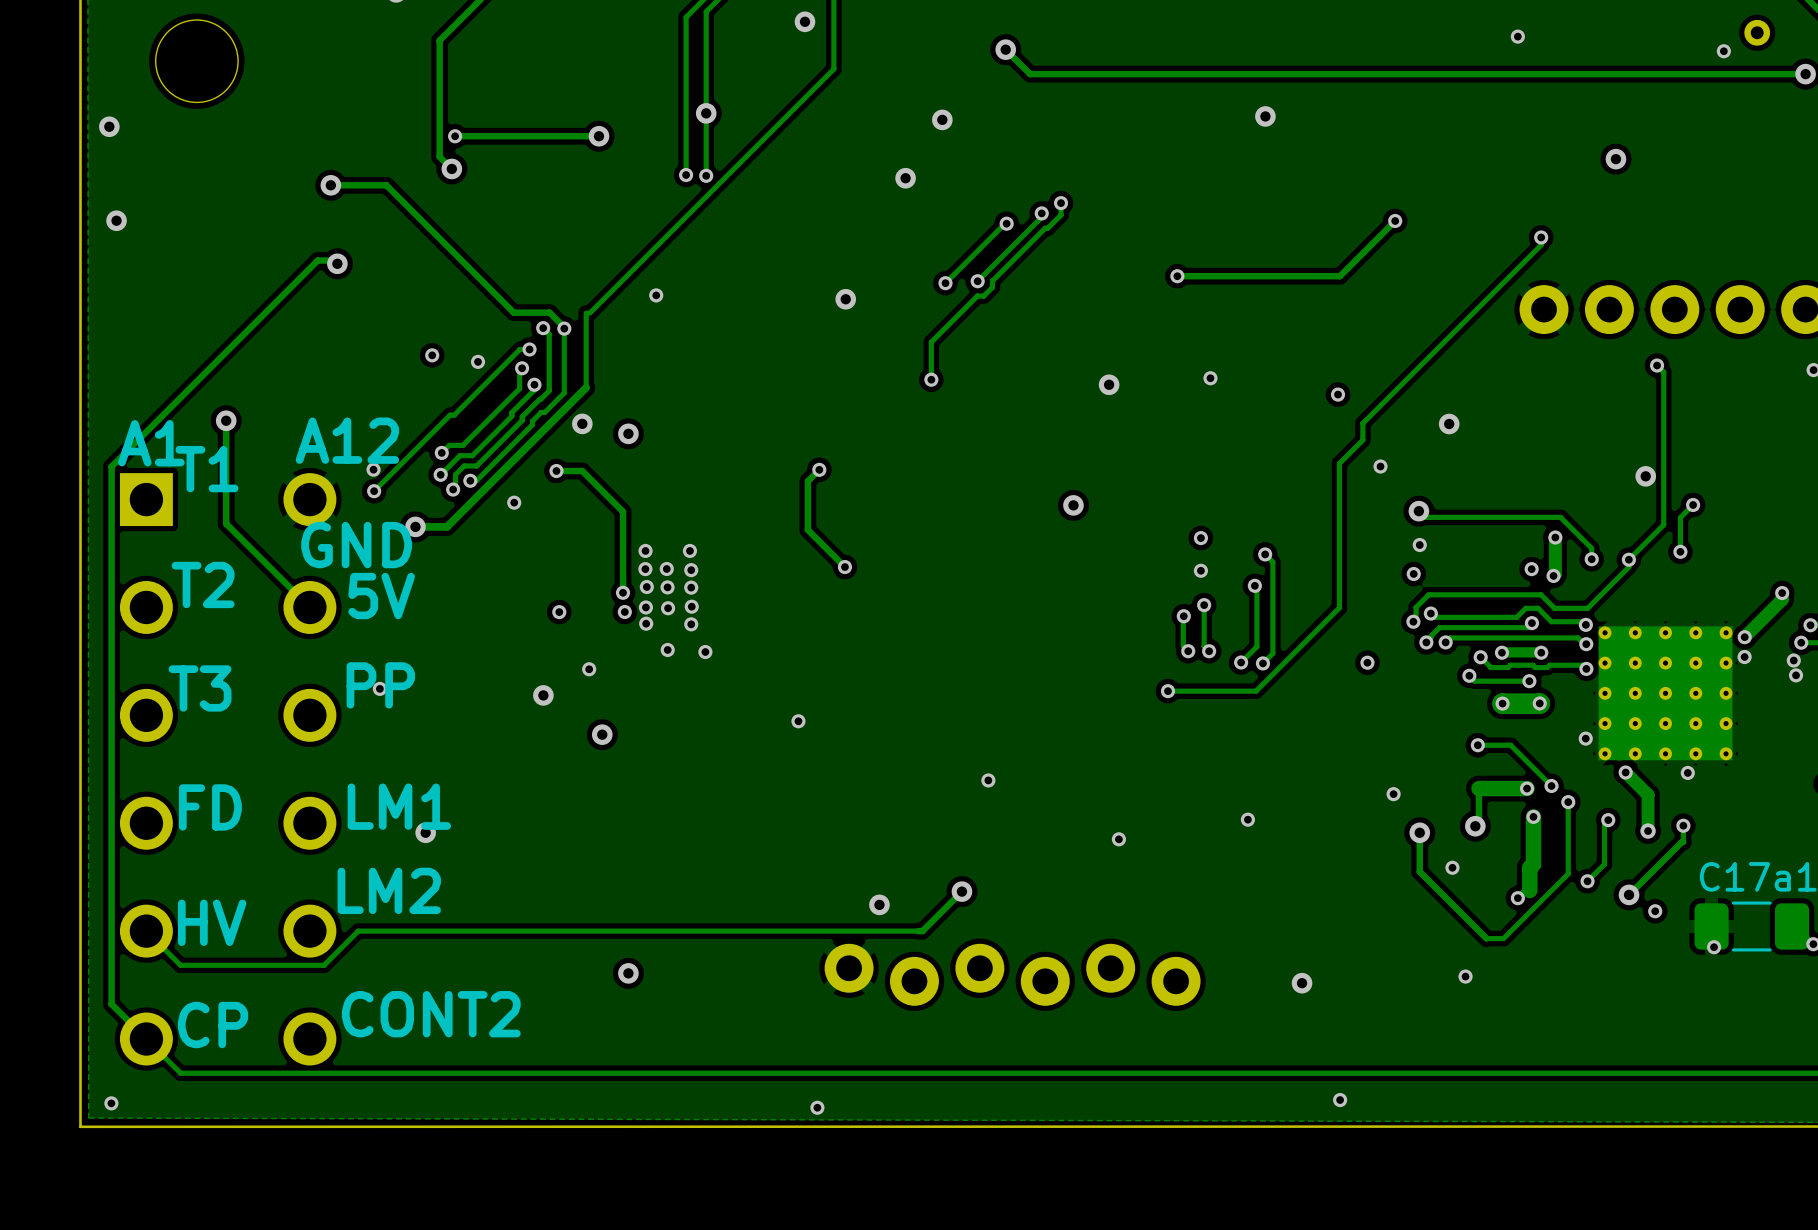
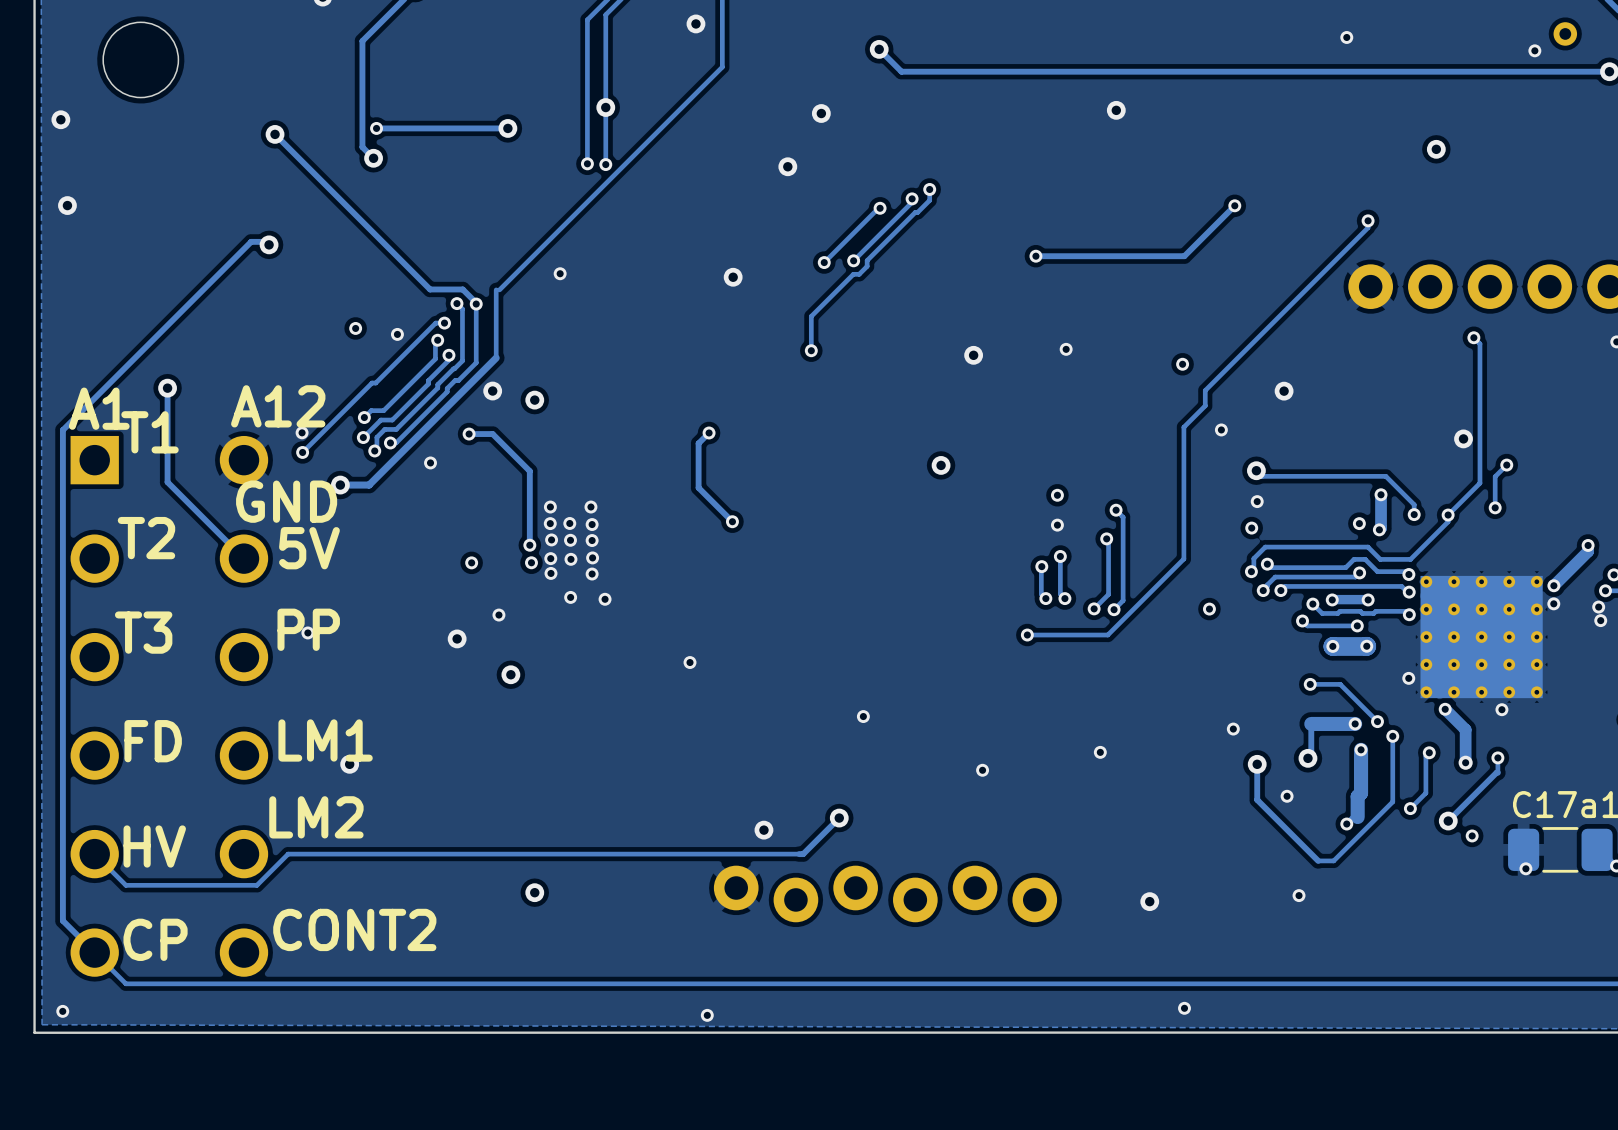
via position: (330, 185) -> (275, 134)
track: (386, 185) (330, 185) -> (313, 173) (275, 134)

